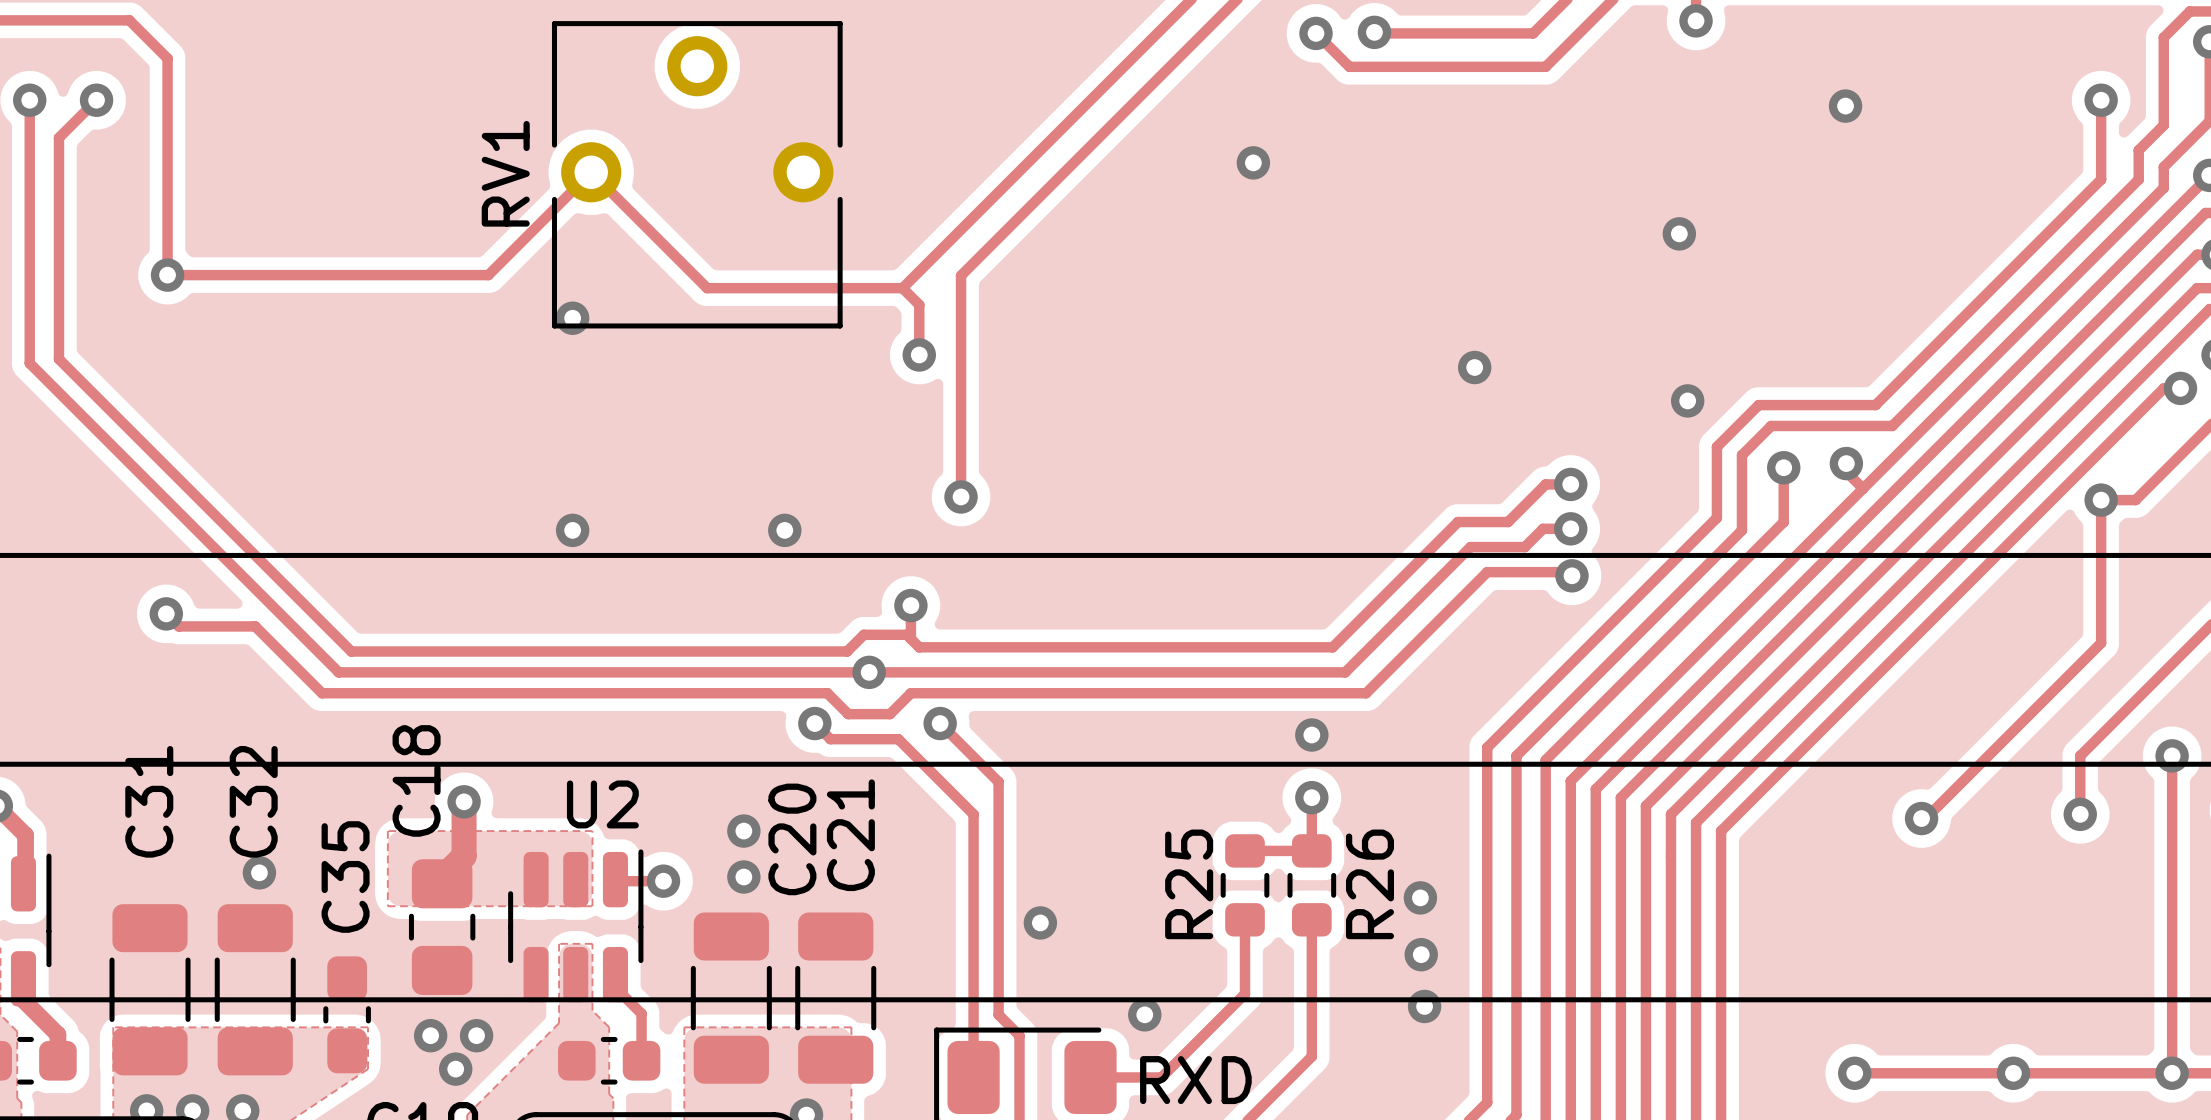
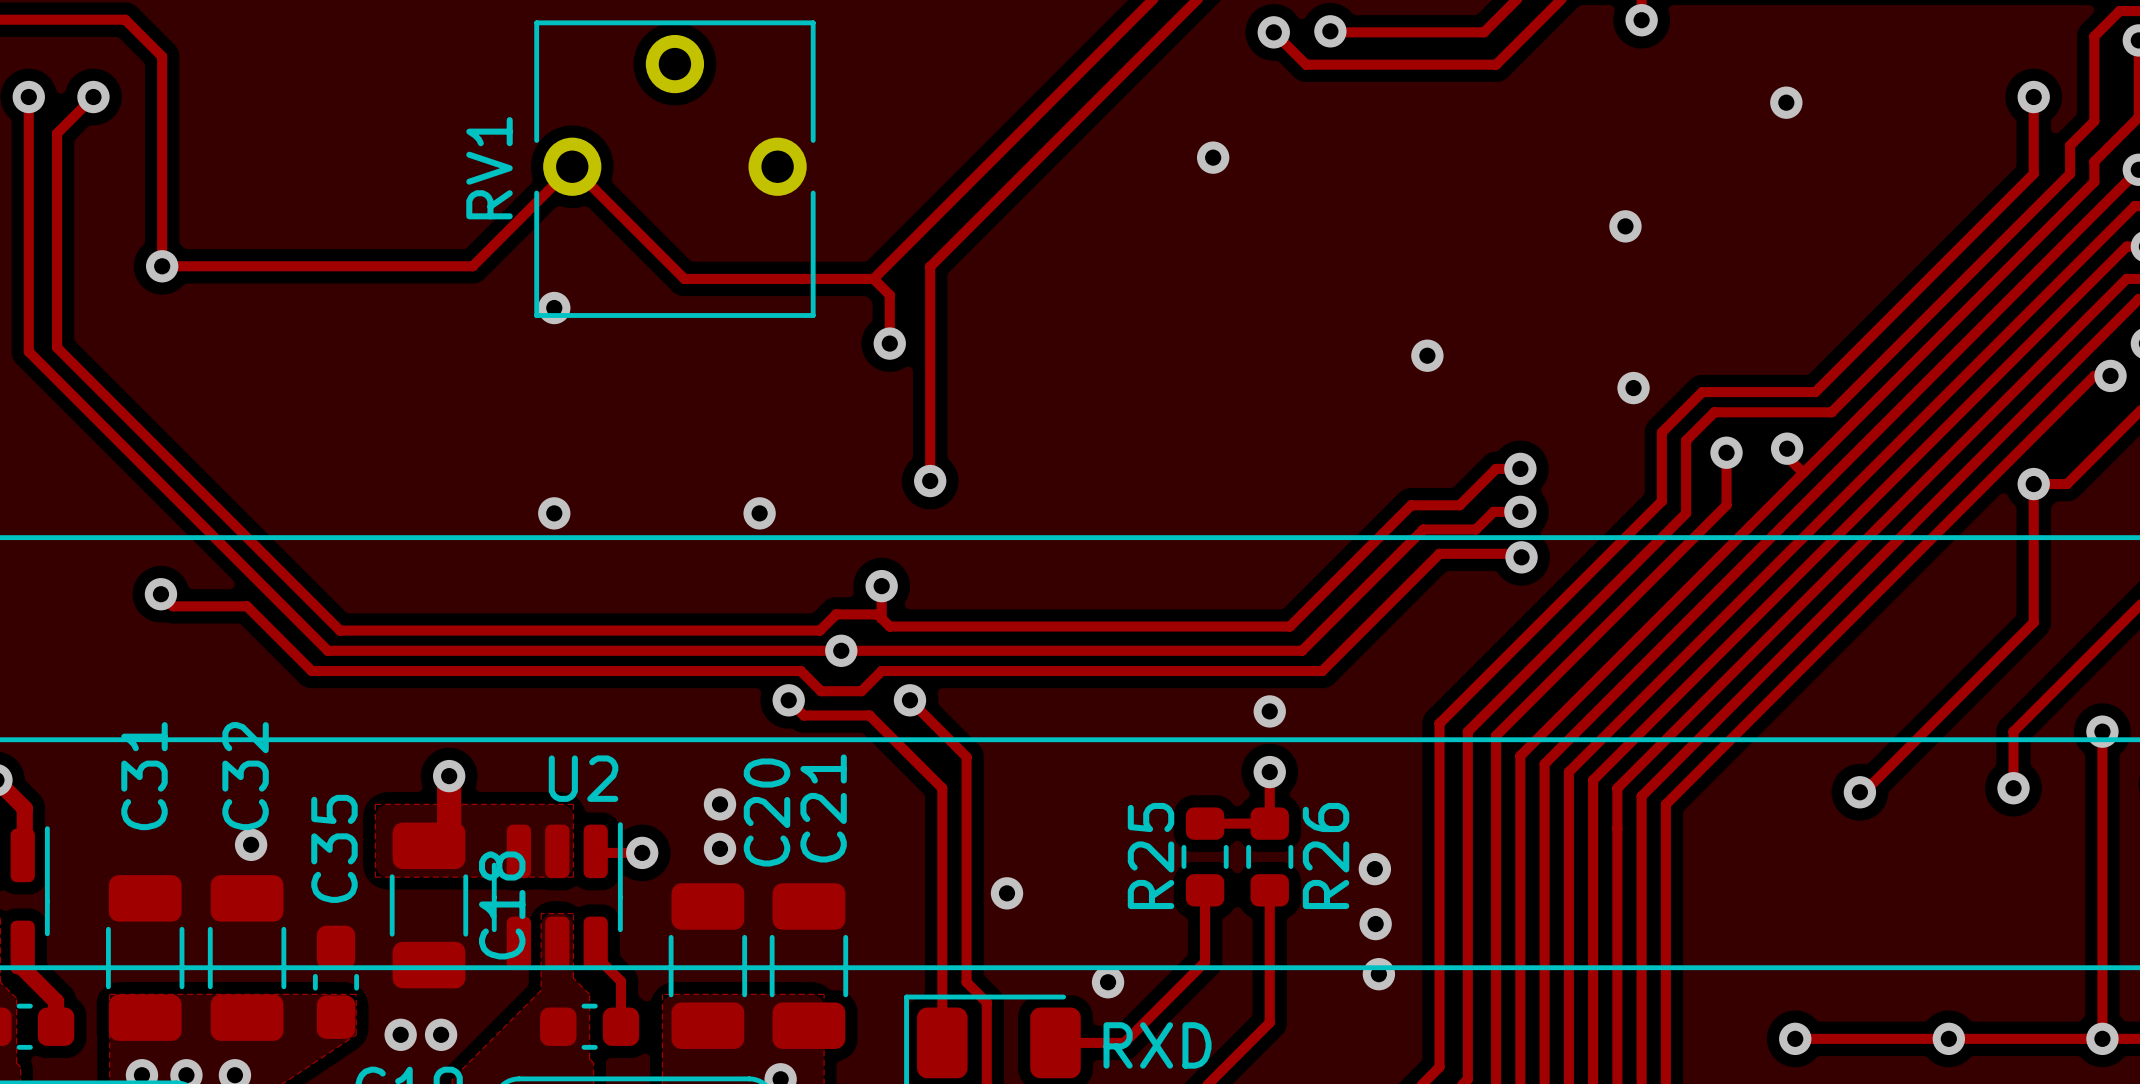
C18 name position: C18 (416, 780) -> C18 (502, 905)
C18 footprint: [408, 859, 476, 995] -> [389, 822, 469, 989]
via position: (430, 1035) -> (400, 1034)
via: (476, 1035) -> none

